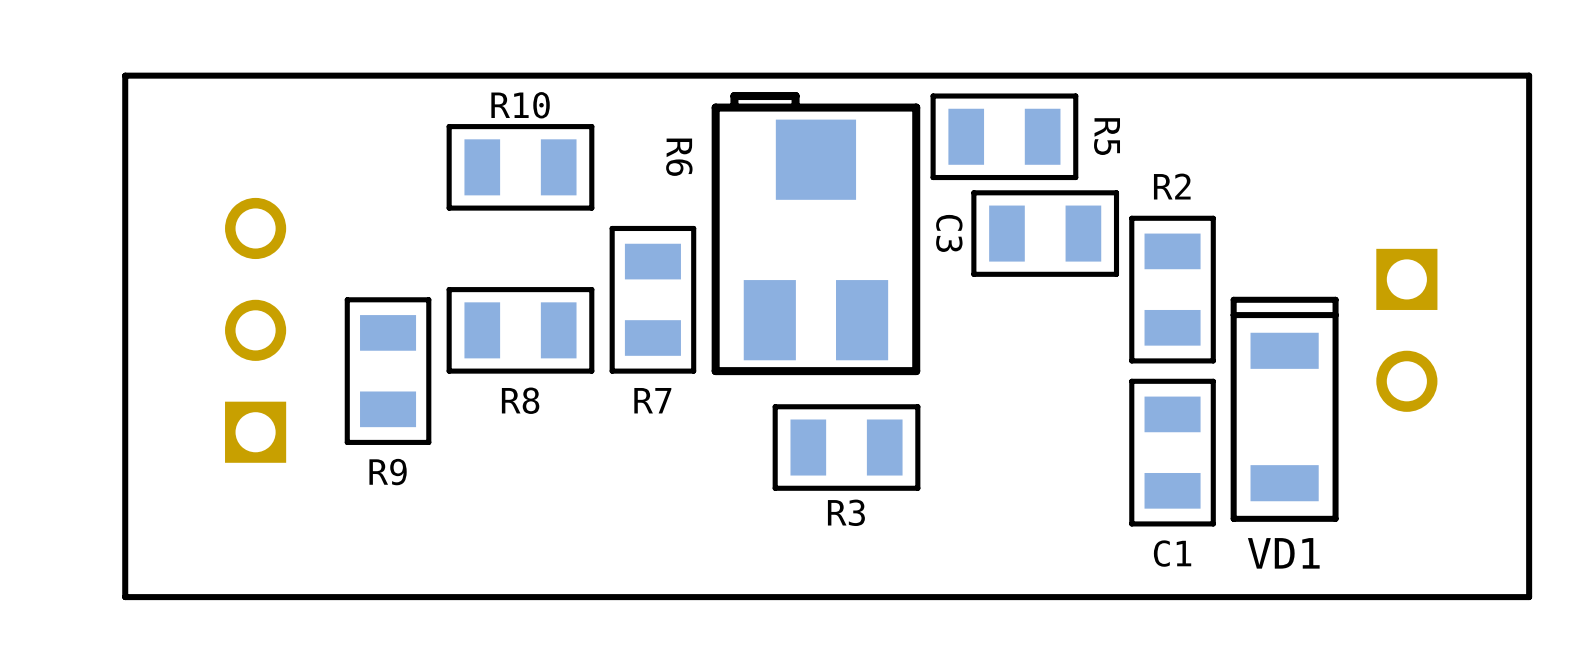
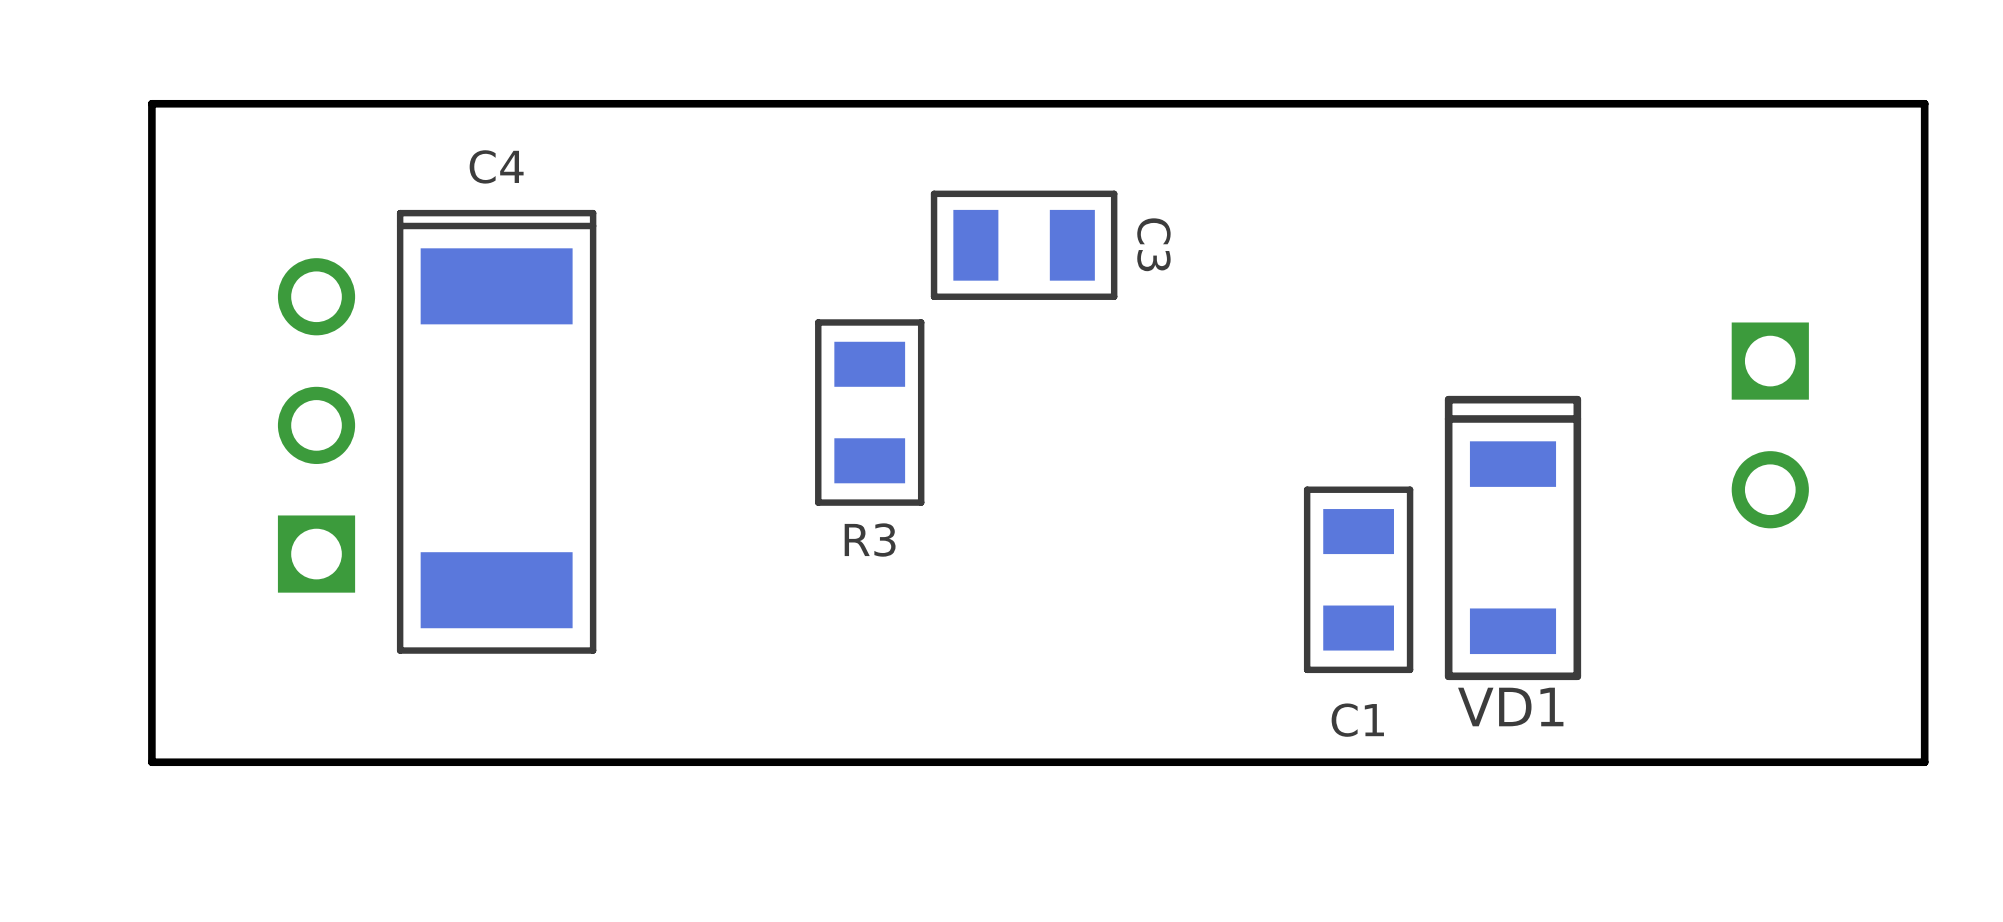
R5: (1004, 136) -> none
R10: (520, 167) -> none
R6: (815, 233) -> none
C3 name position: C3 (949, 233) -> C3 (1153, 244)
C3 position: (1045, 233) -> (1024, 245)
R2: (1172, 289) -> none
R7: (652, 299) -> none
R8: (520, 330) -> none
C4: none -> (496, 431)
R9: (388, 371) -> none
VD1 position: (1284, 409) -> (1512, 537)
R3 rotation: 0° (846, 447) -> 90° clockwise (869, 412)
R3 position: (846, 447) -> (869, 412)
C1 position: (1172, 452) -> (1358, 579)
C1 name position: C1 (1172, 553) -> C1 (1357, 720)
VD1 name position: VD1 (1283, 553) -> VD1 (1510, 707)

